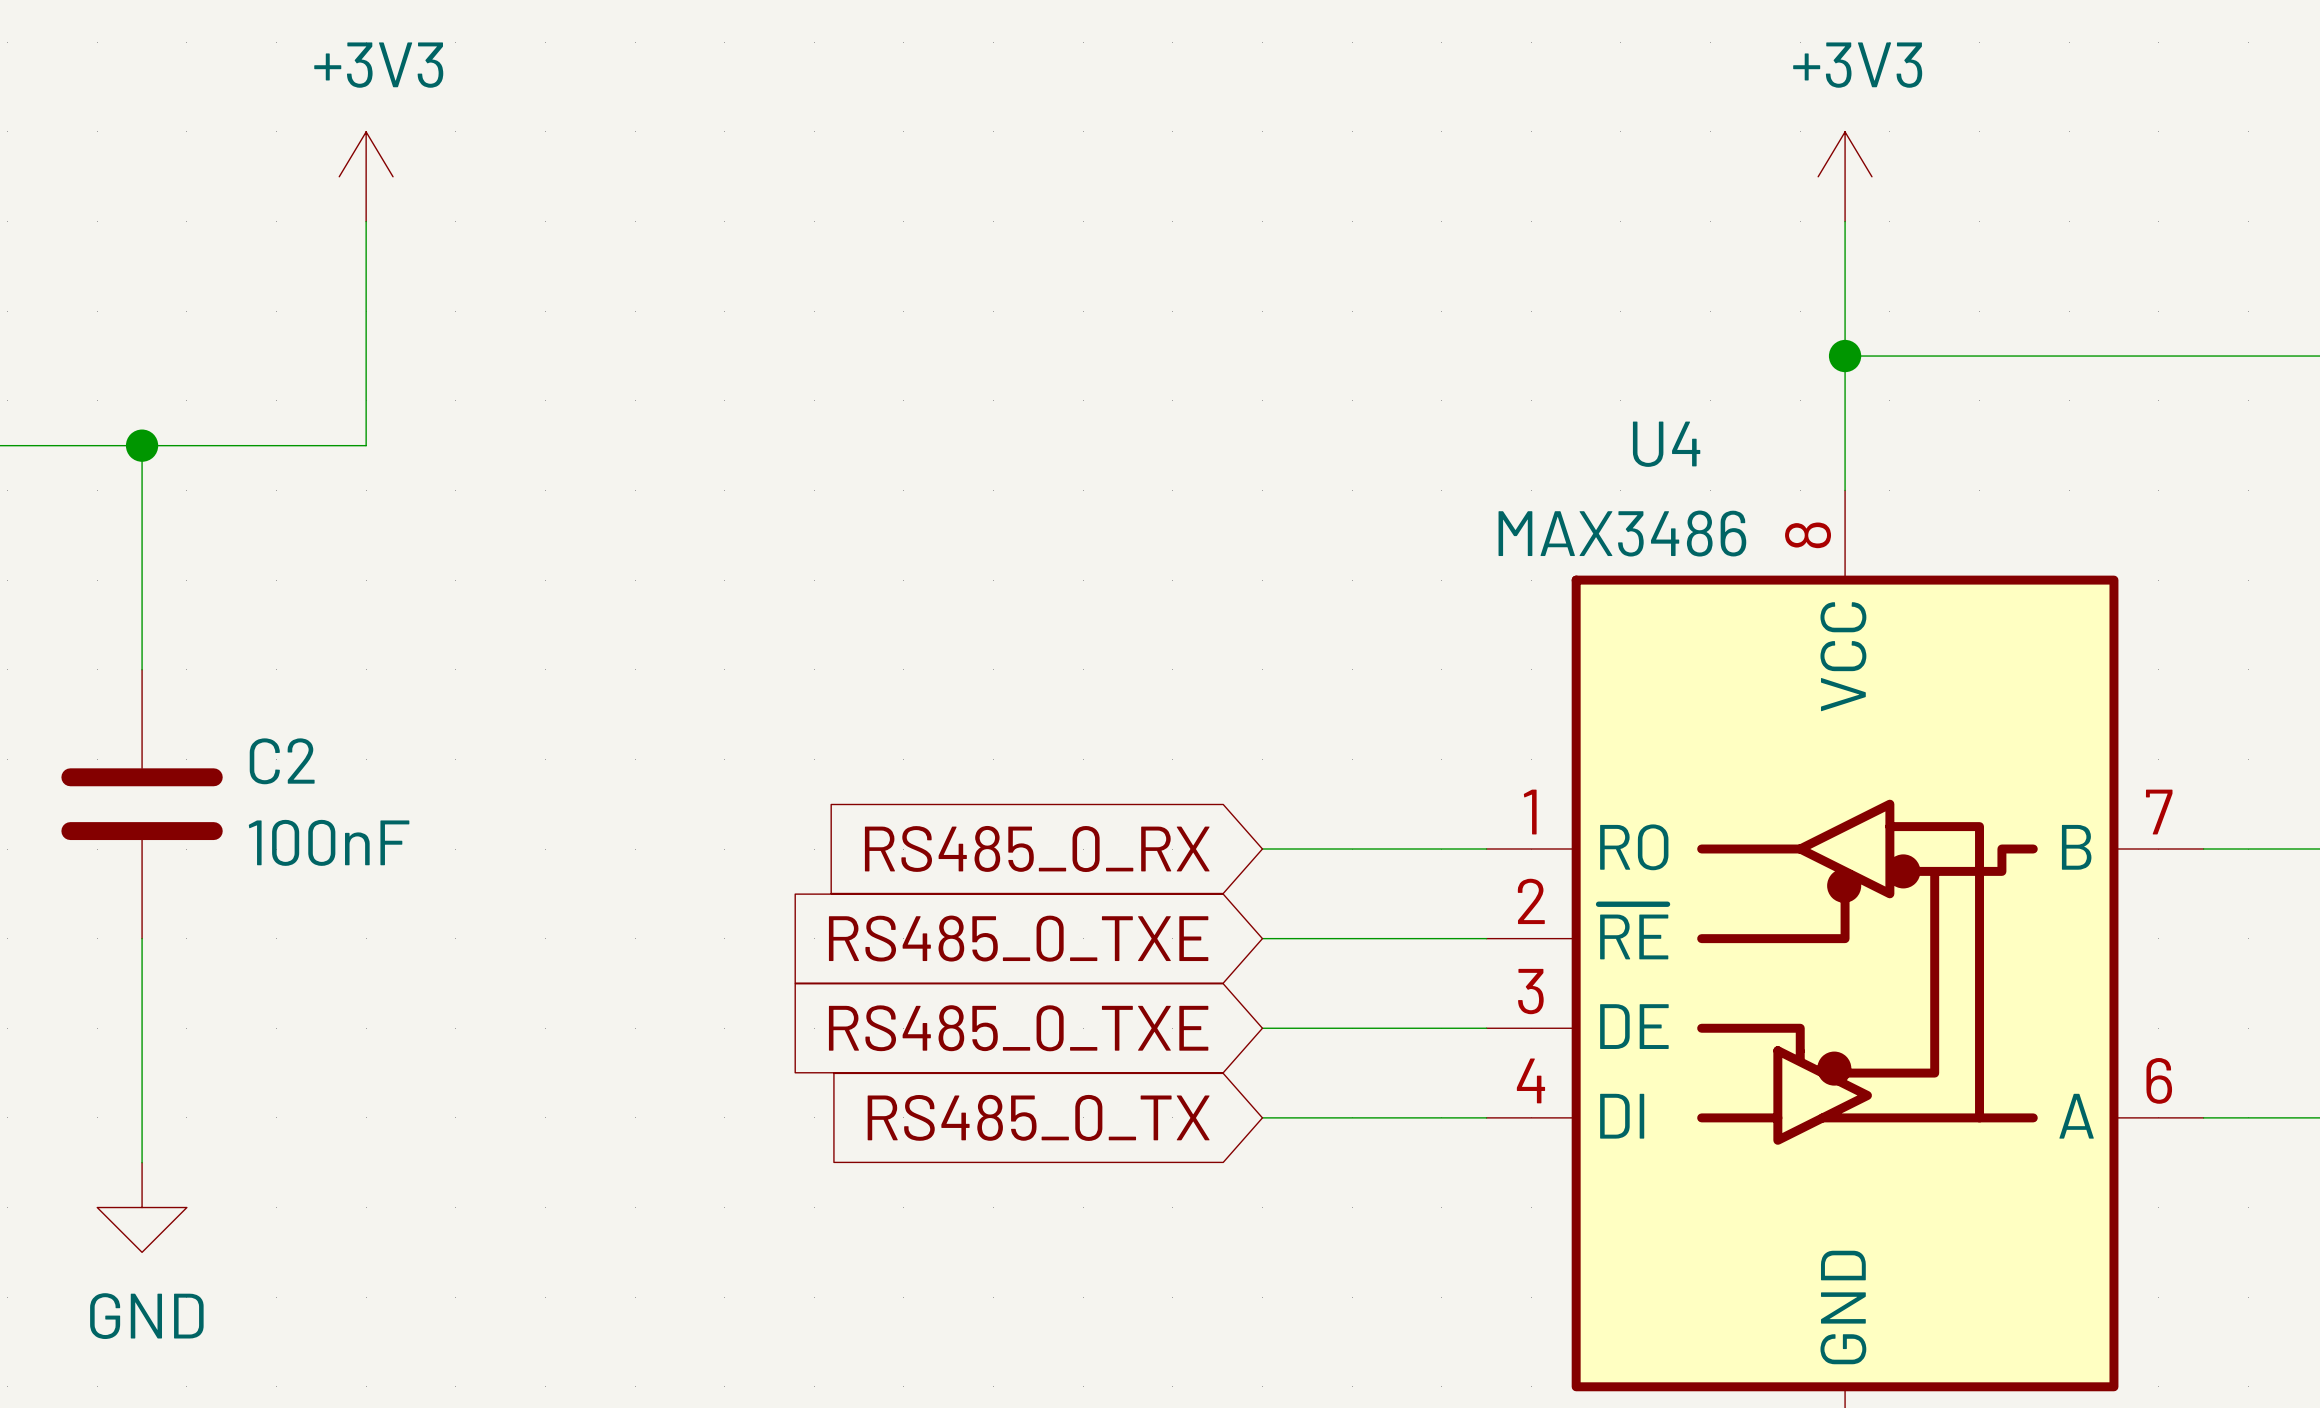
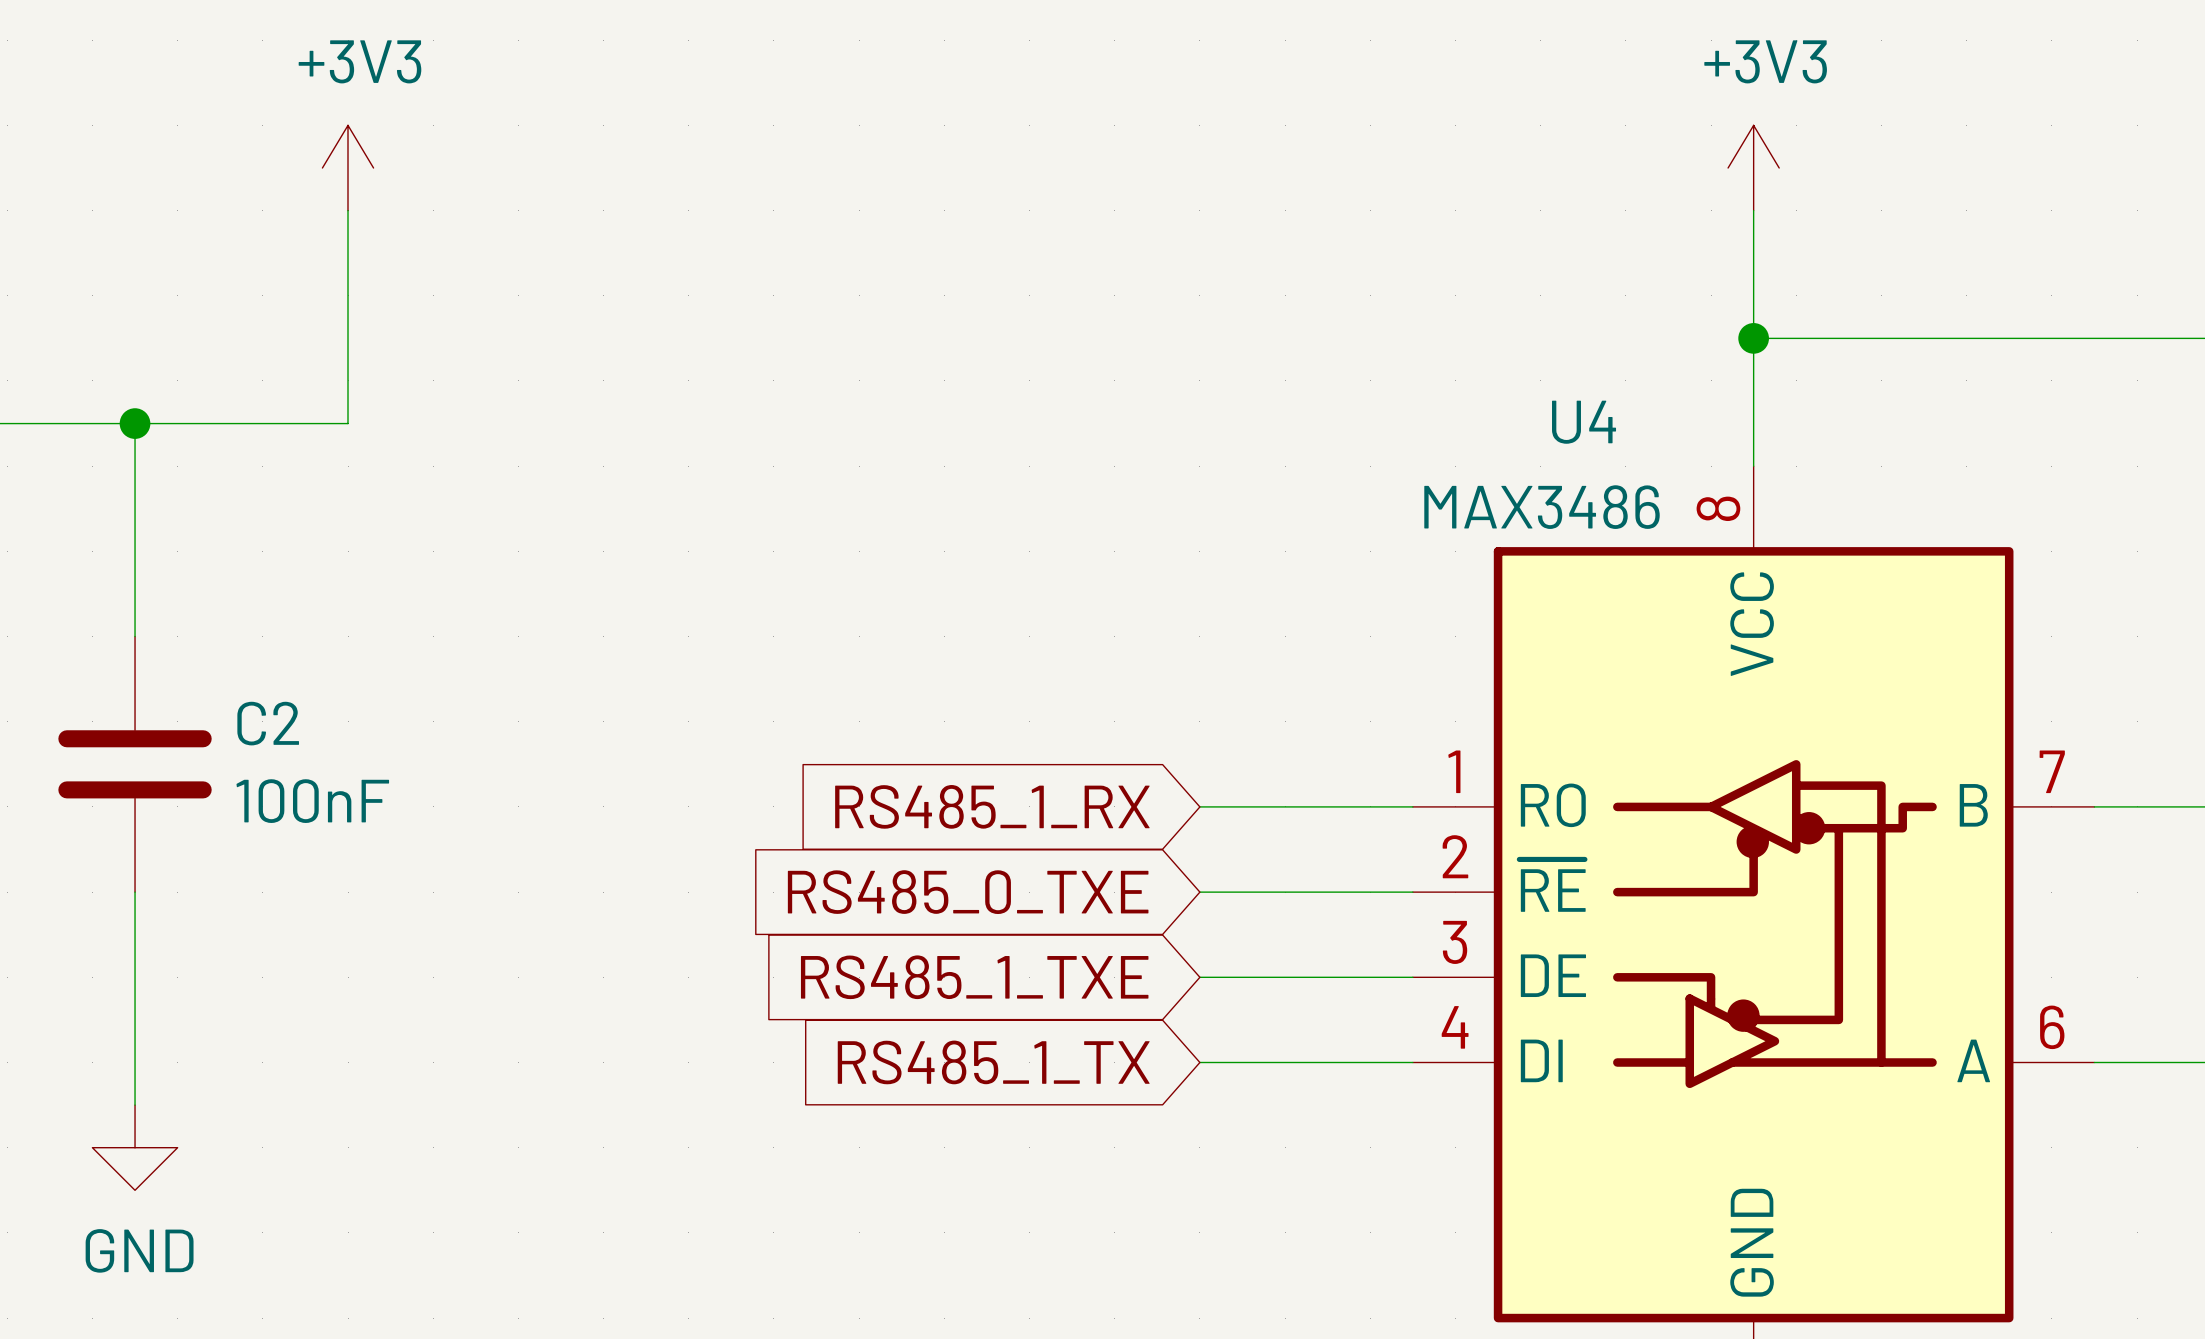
global label: RS485_0_RX (1037, 849) -> RS485_1_RX (992, 806)
global label: RS485_0_TXE (1018, 1028) -> RS485_1_TXE (974, 977)
global label: RS485_0_TX (1038, 1117) -> RS485_1_TX (993, 1062)

